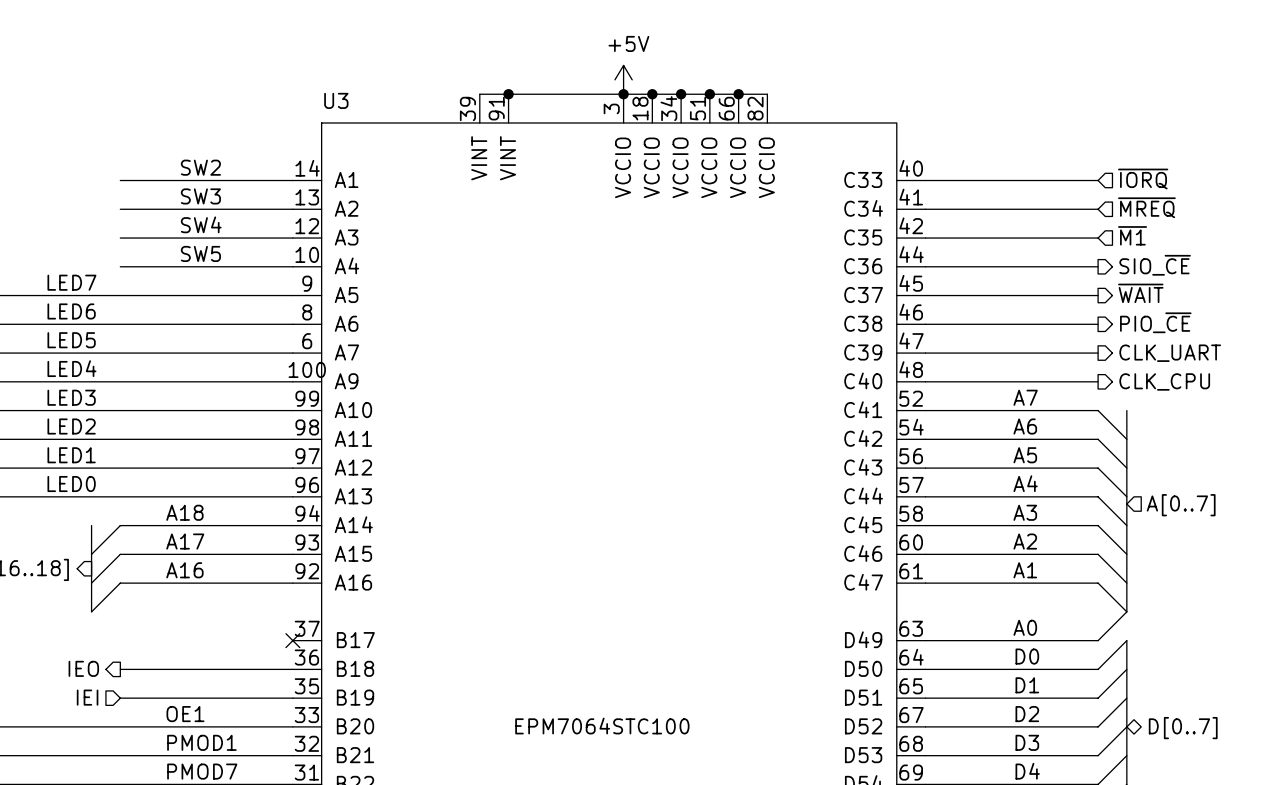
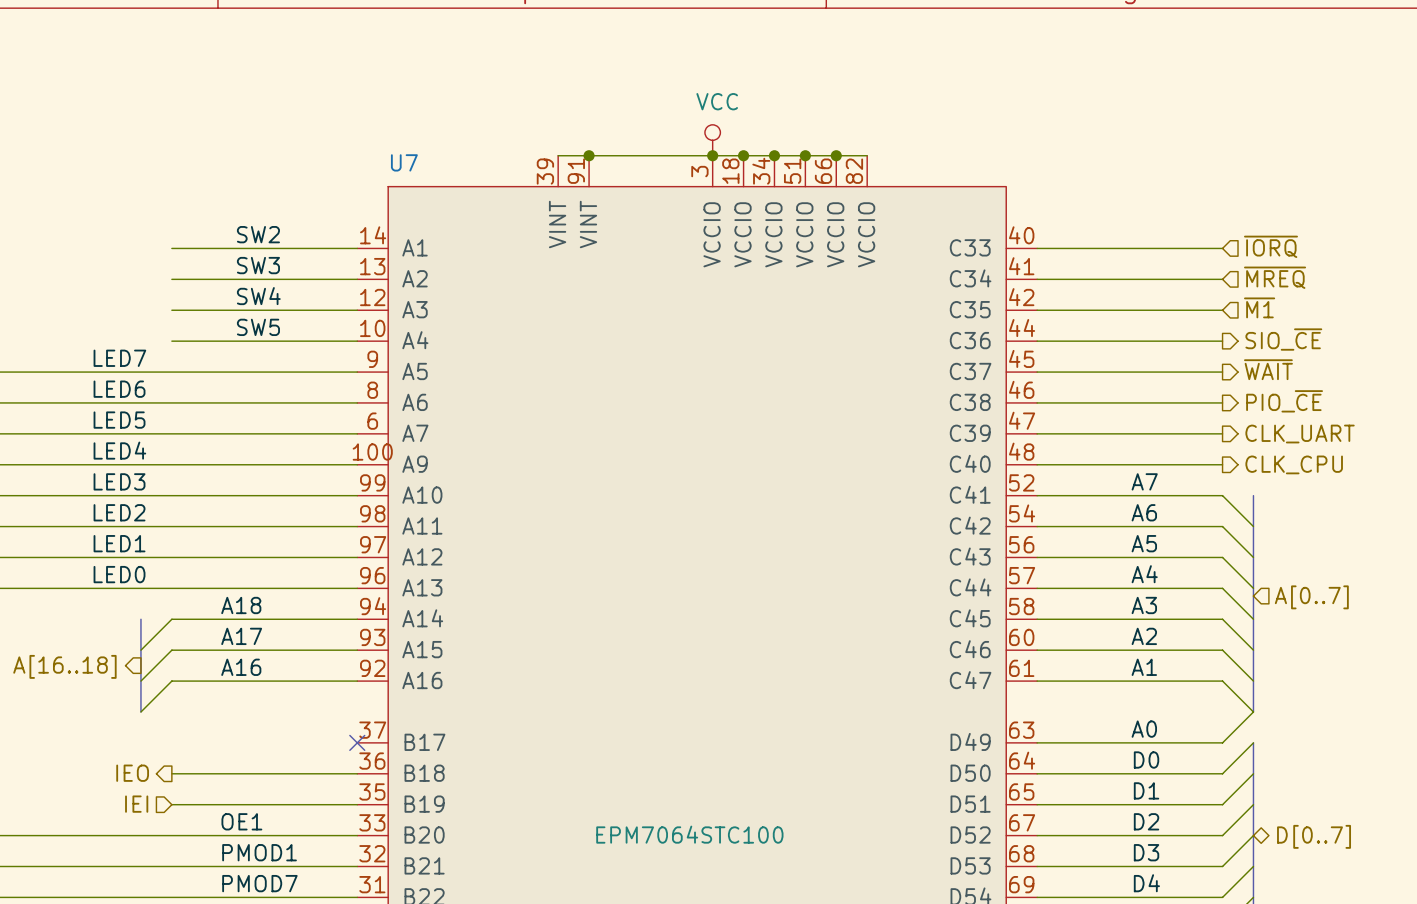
power symbol: +5V (623, 79) -> VCC (712, 140)
U3 name: U3 (336, 100) -> U7 (404, 162)

